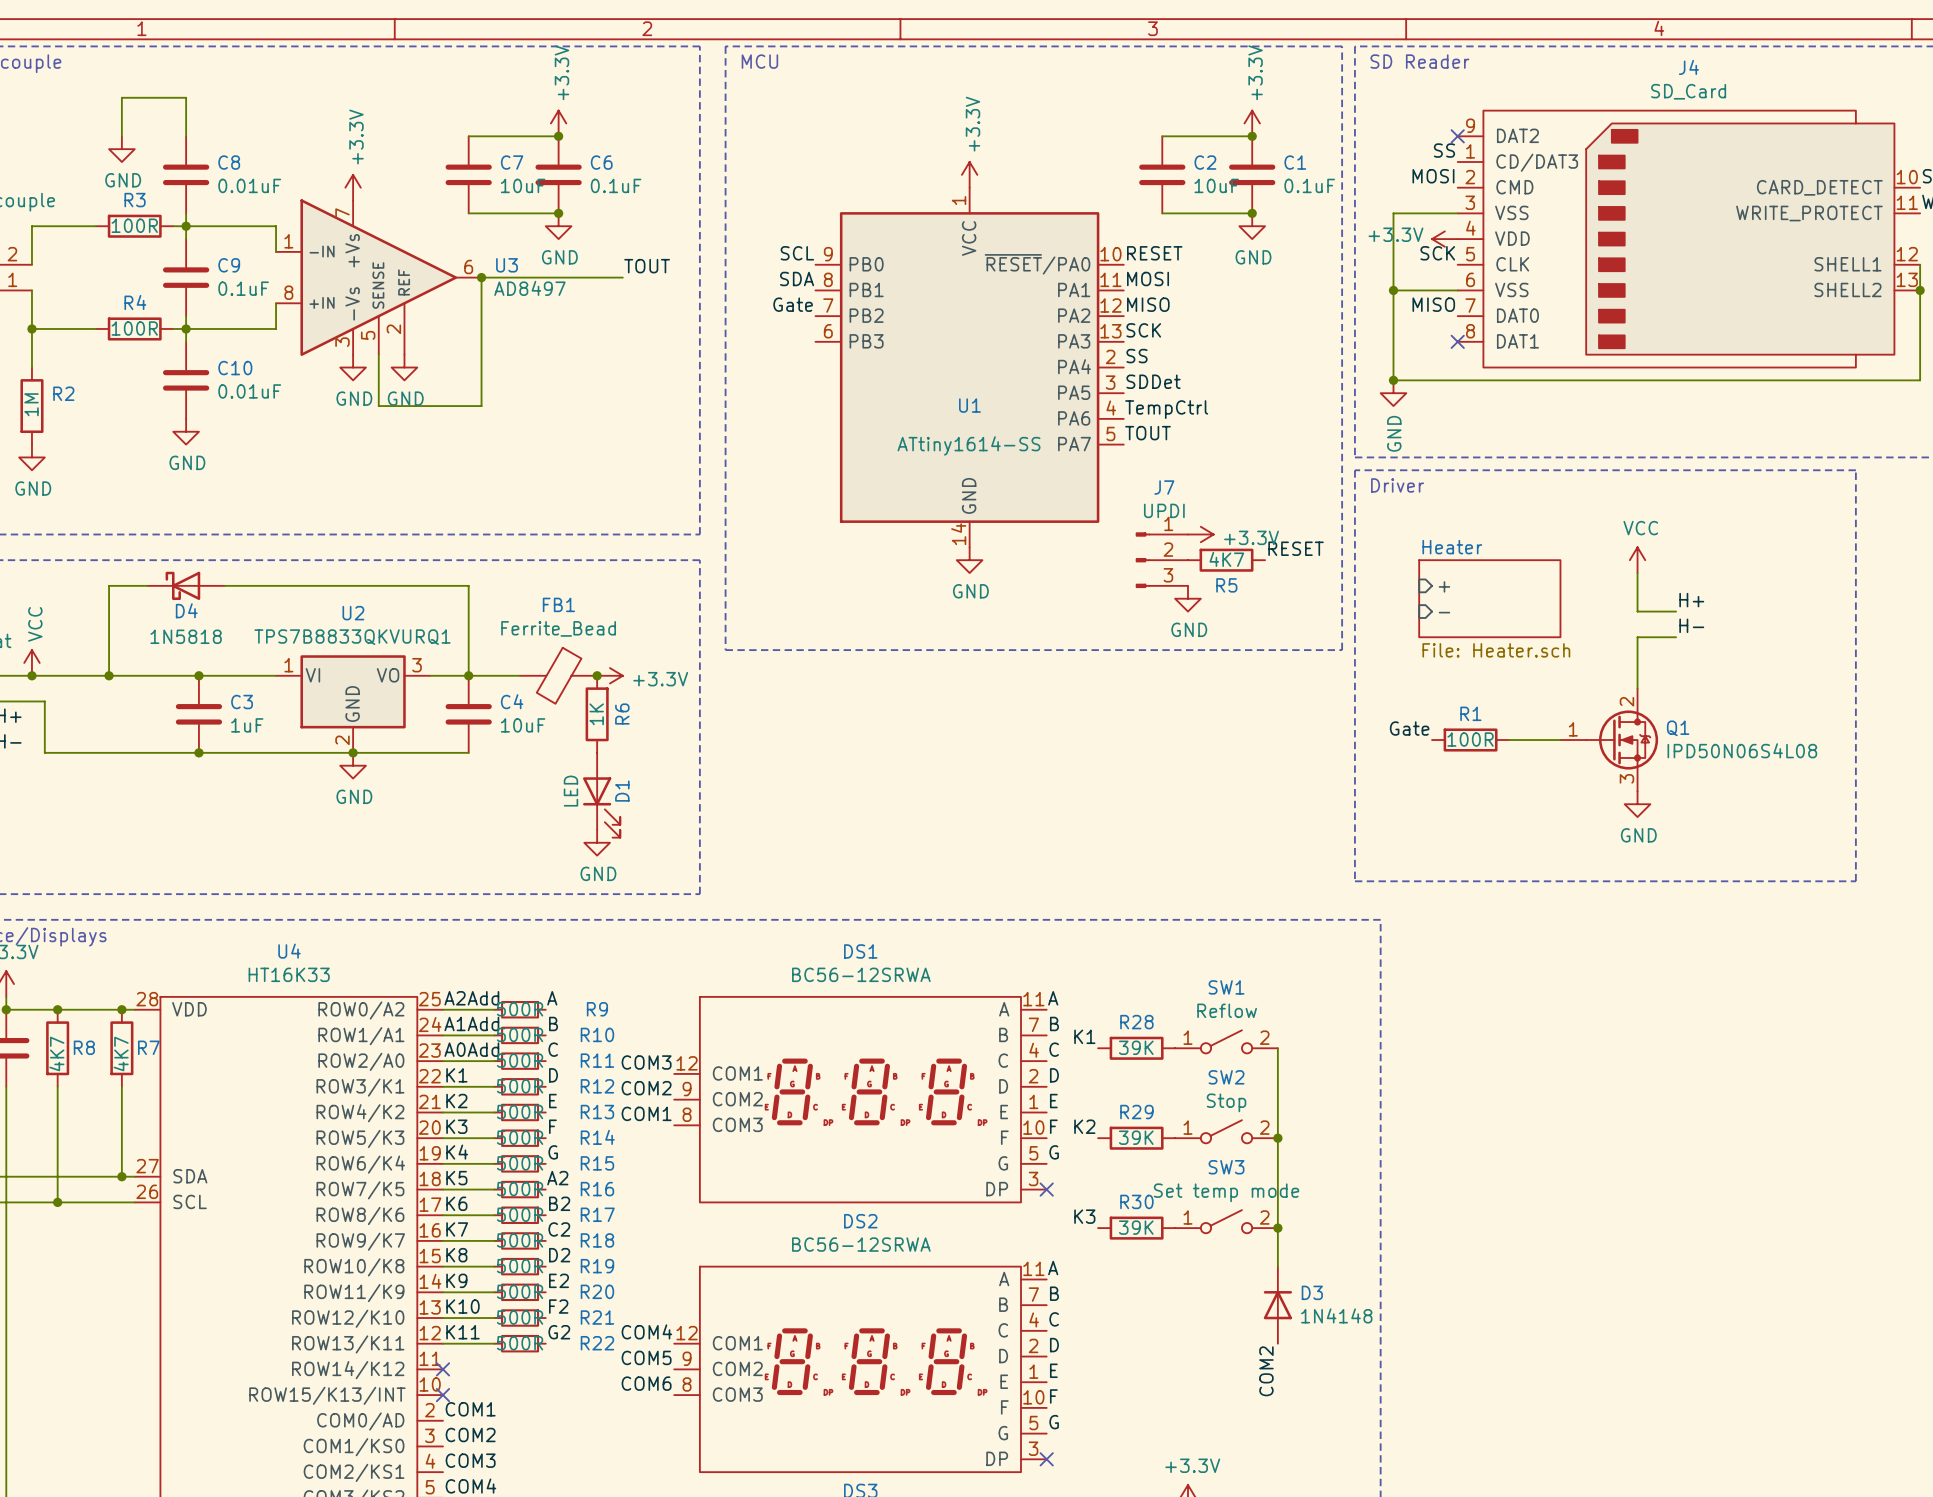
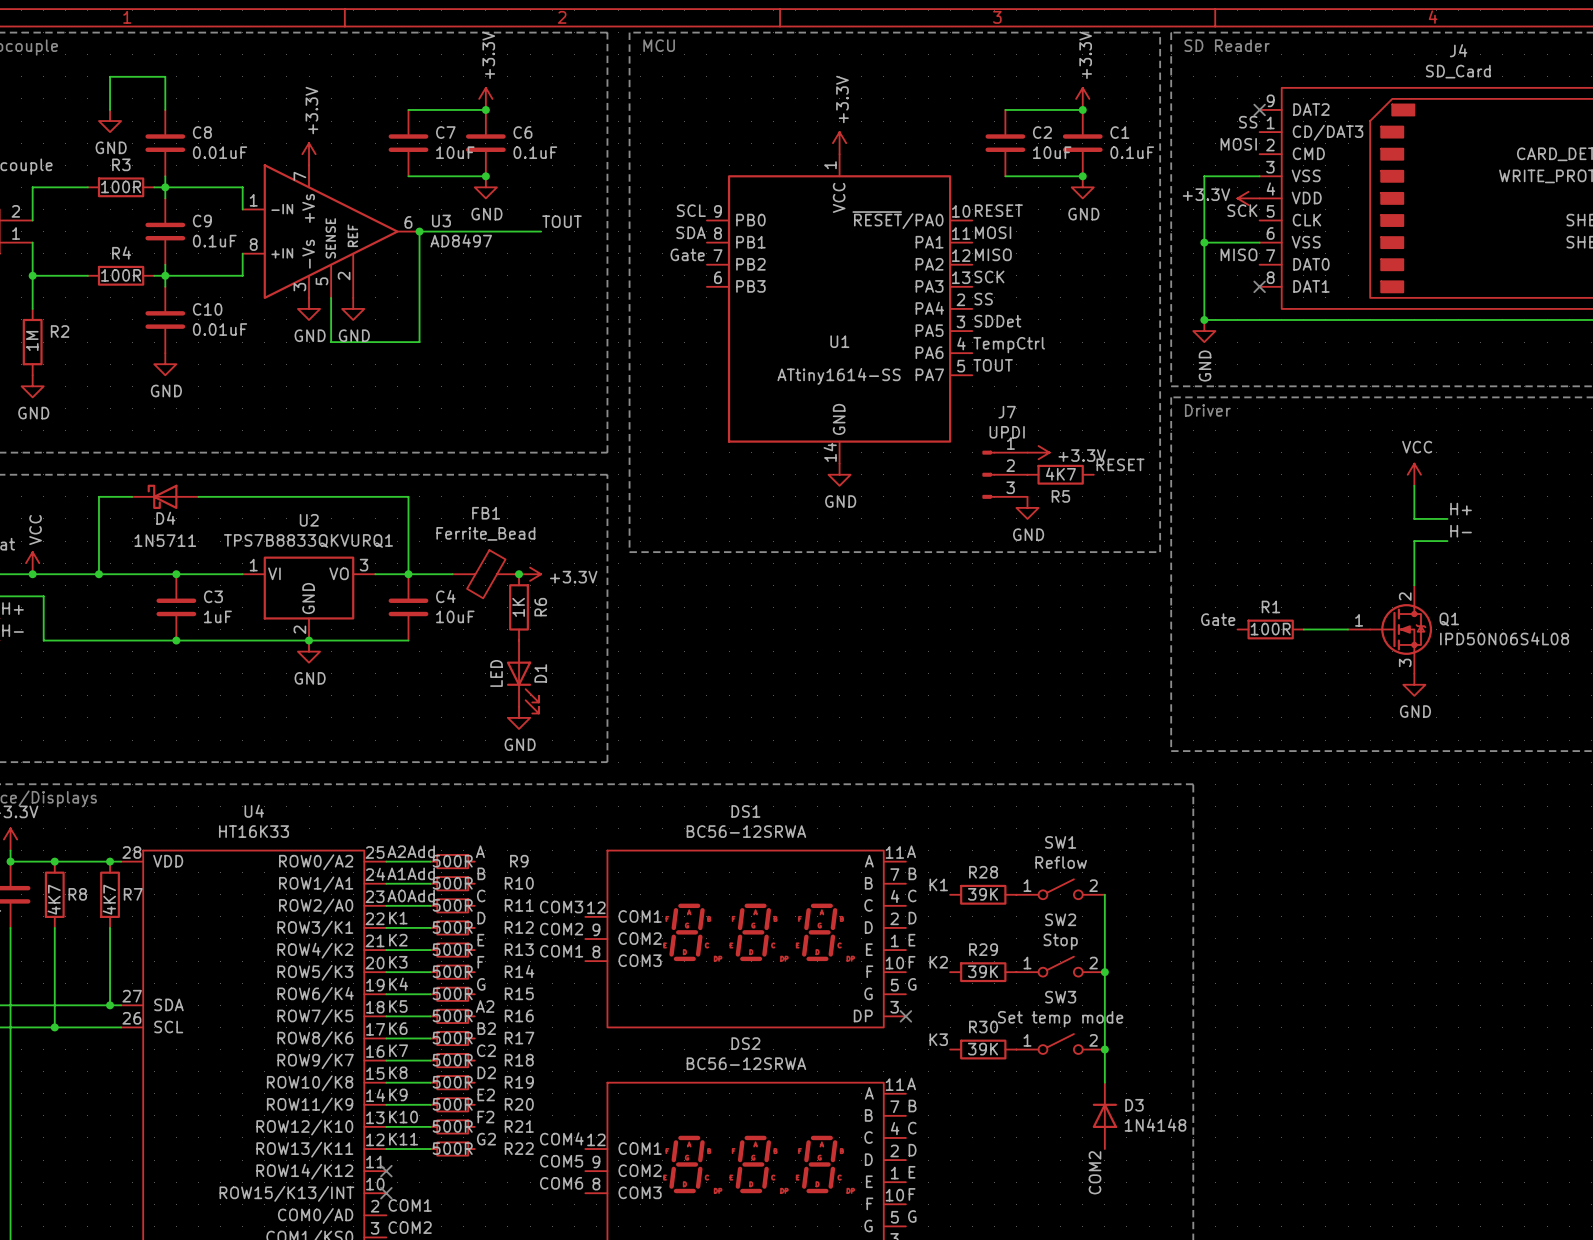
sheet pin: + (1444, 586) -> none
sheet Heater: File: Heater.sch (1489, 598) -> none
sheet pin: - (1444, 612) -> none
D4 value: 1N5818 (186, 636) -> 1N5711 (165, 540)

